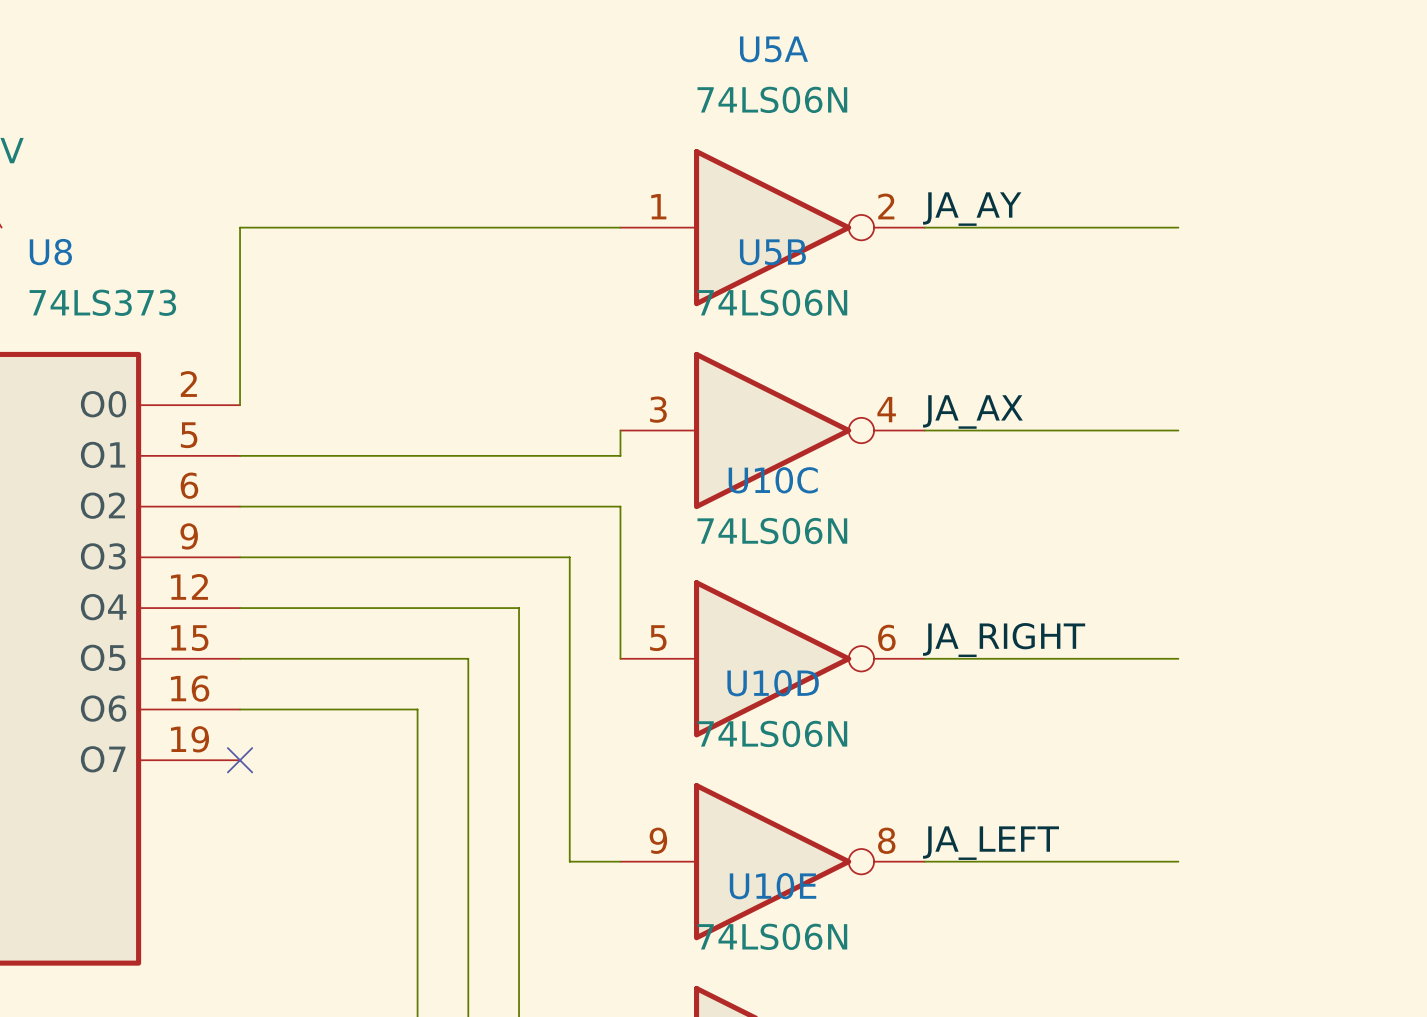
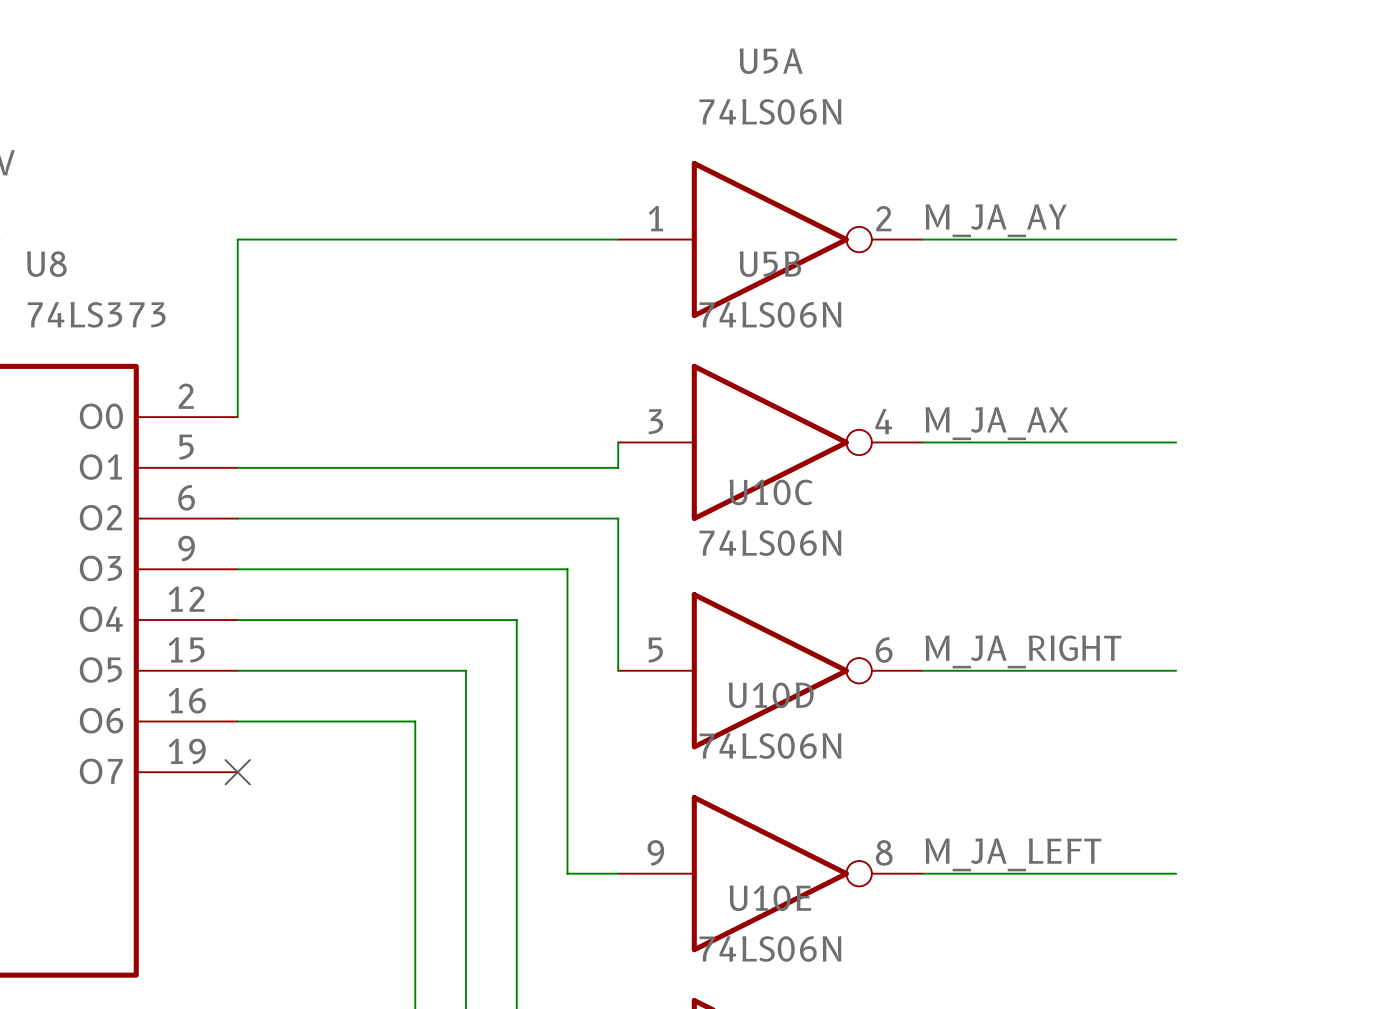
label: JA_AY (972, 209) -> M_JA_AY (996, 220)
label: JA_AX (972, 411) -> M_JA_AX (996, 423)
label: JA_RIGHT (1004, 640) -> M_JA_RIGHT (1023, 651)
label: JA_LEFT (991, 843) -> M_JA_LEFT (1013, 854)

